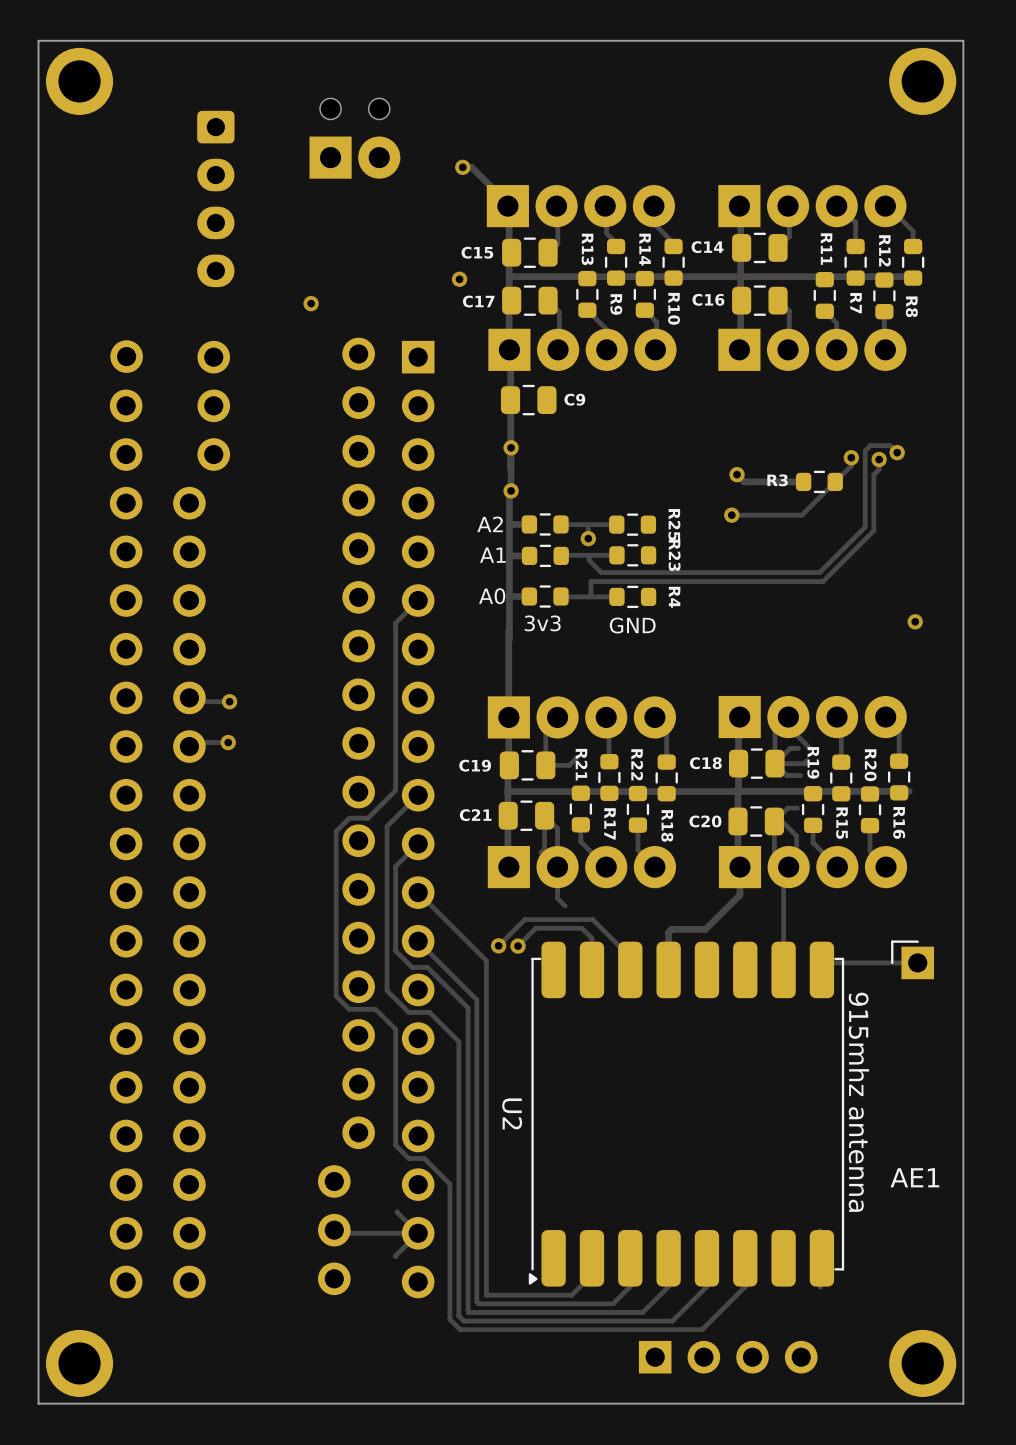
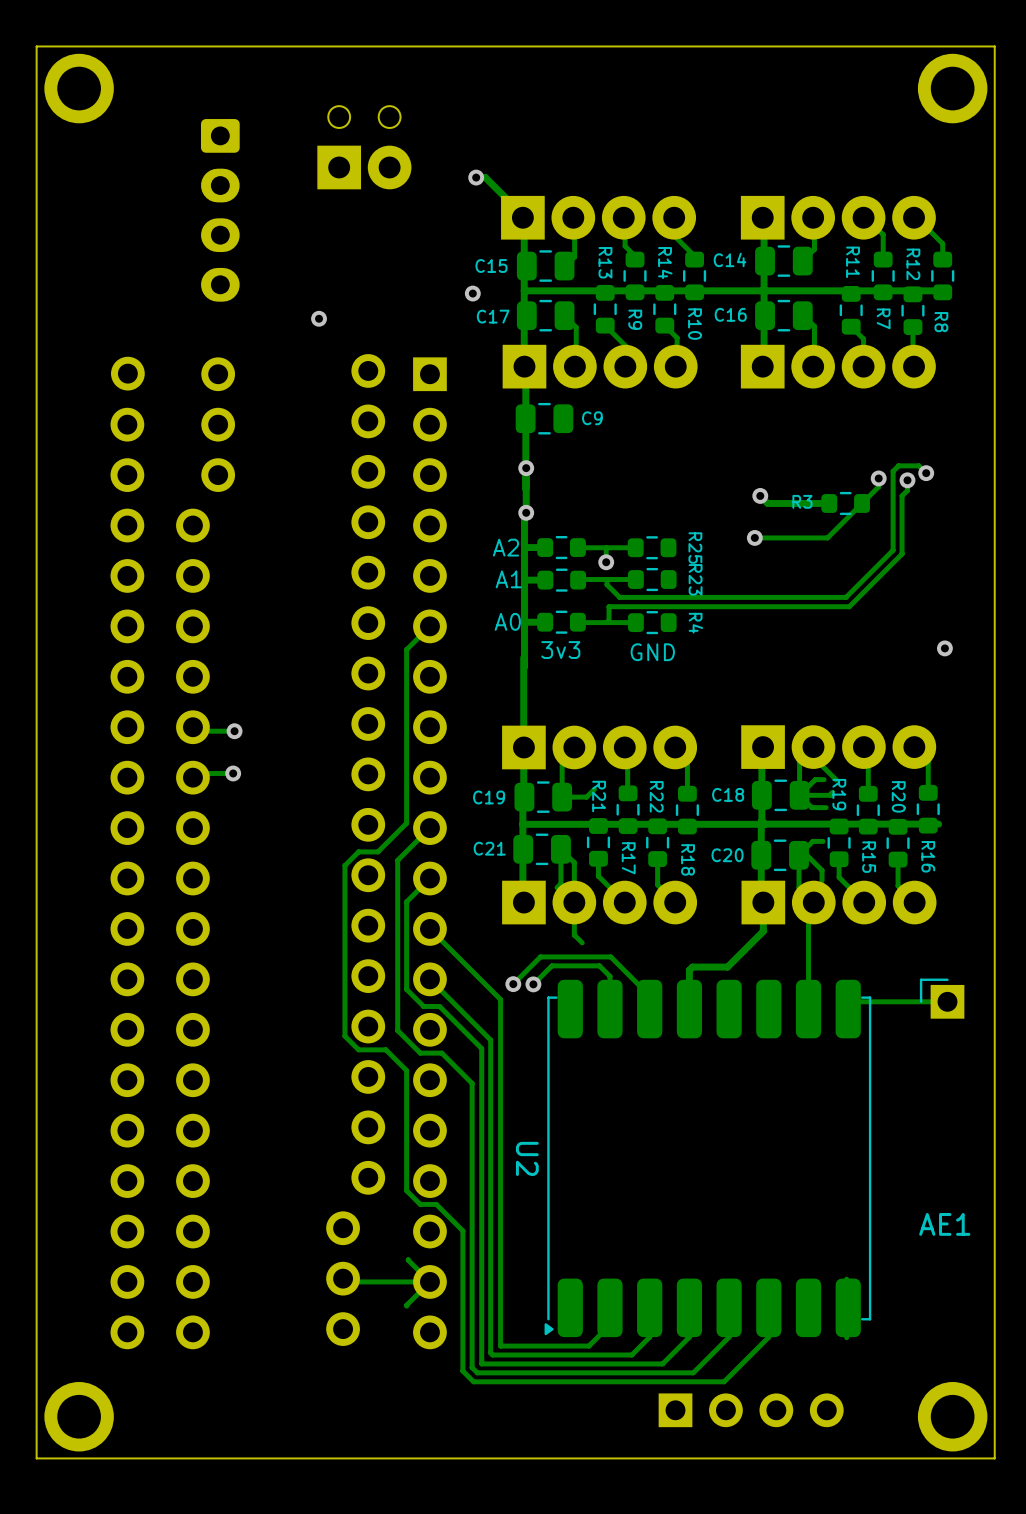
AE1 value: 915mhz antenna (858, 1102) -> none

